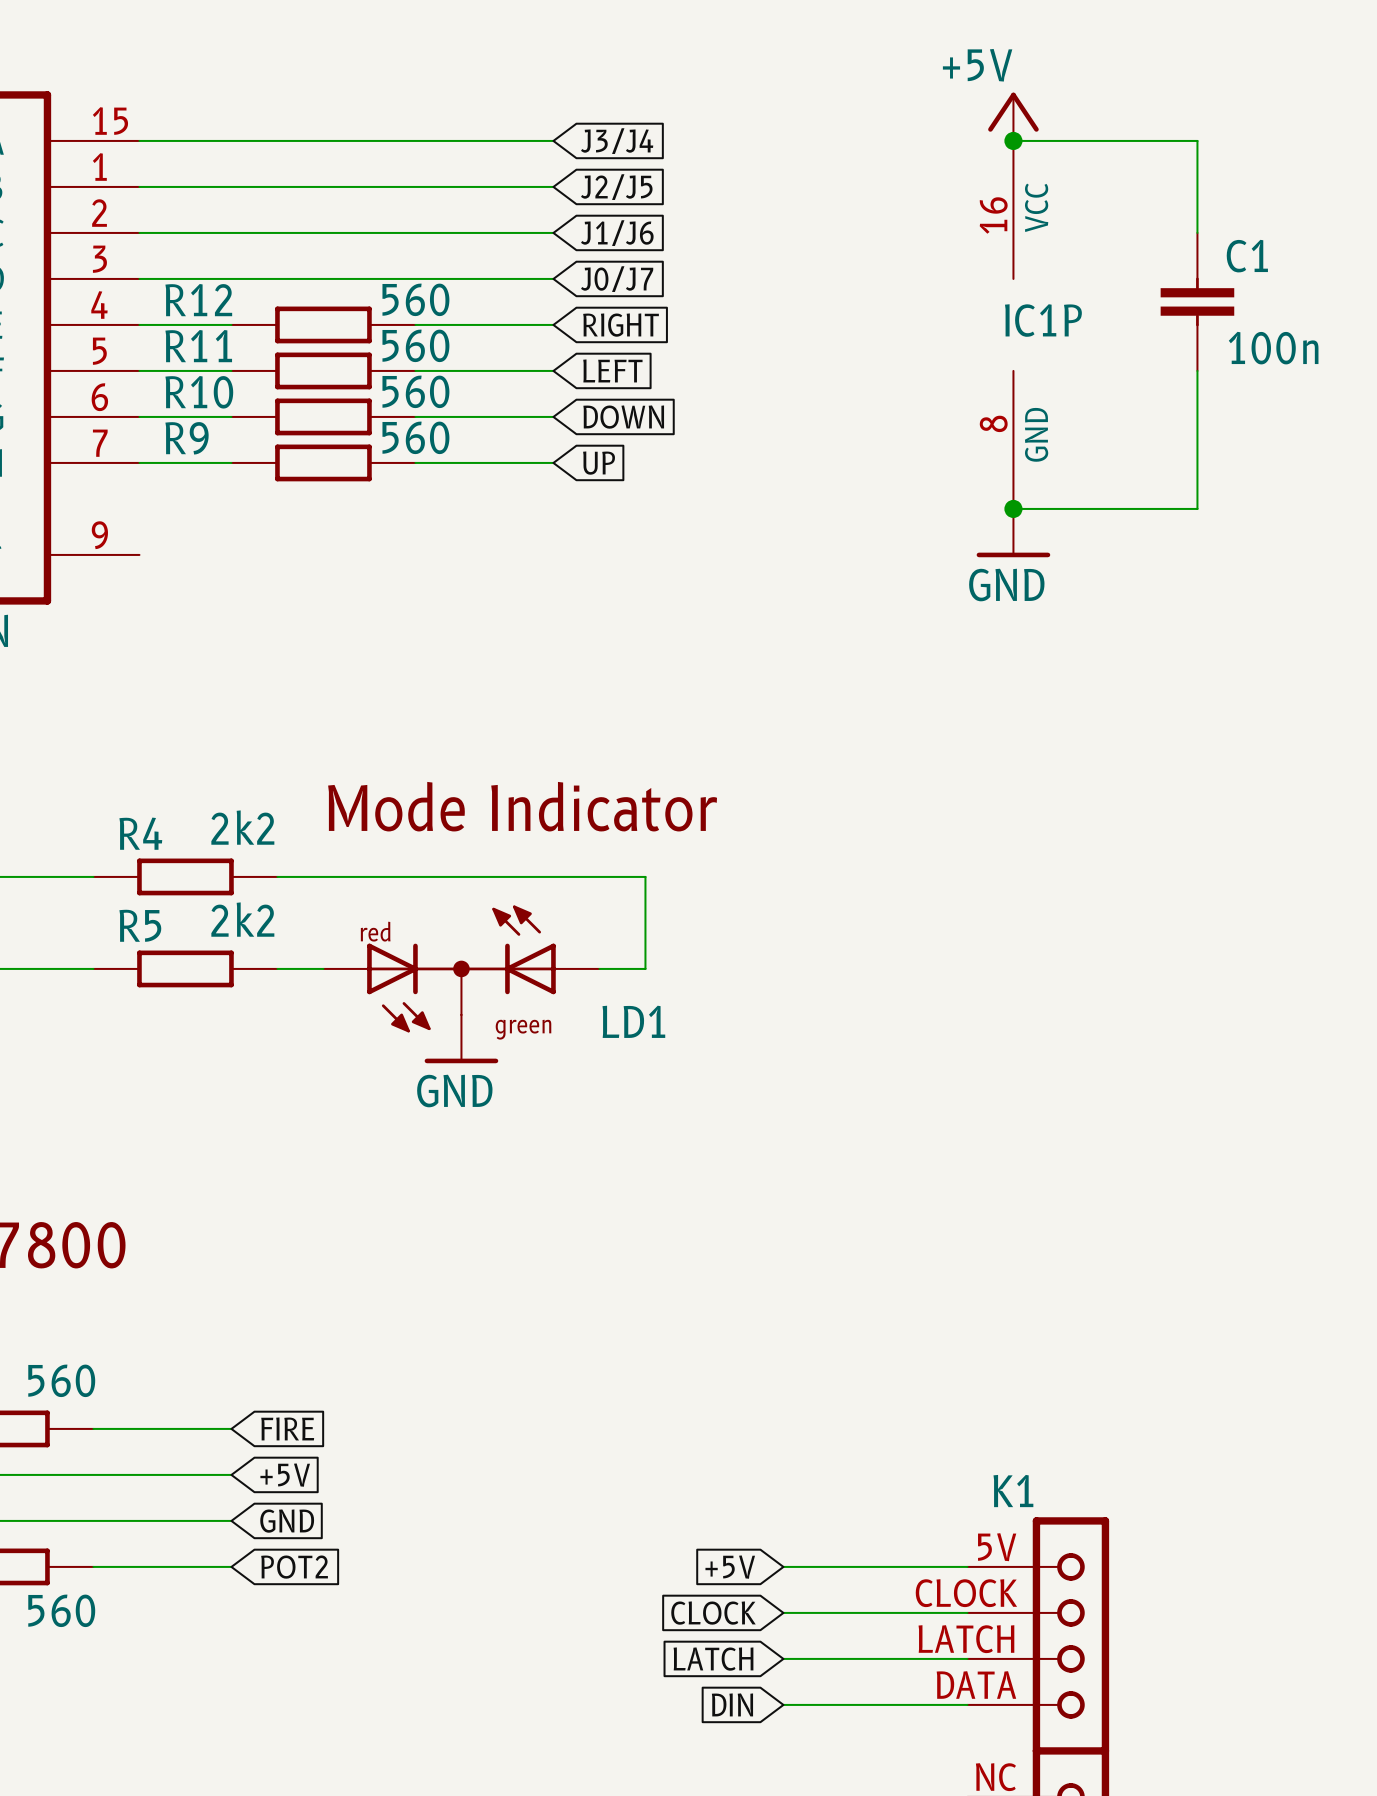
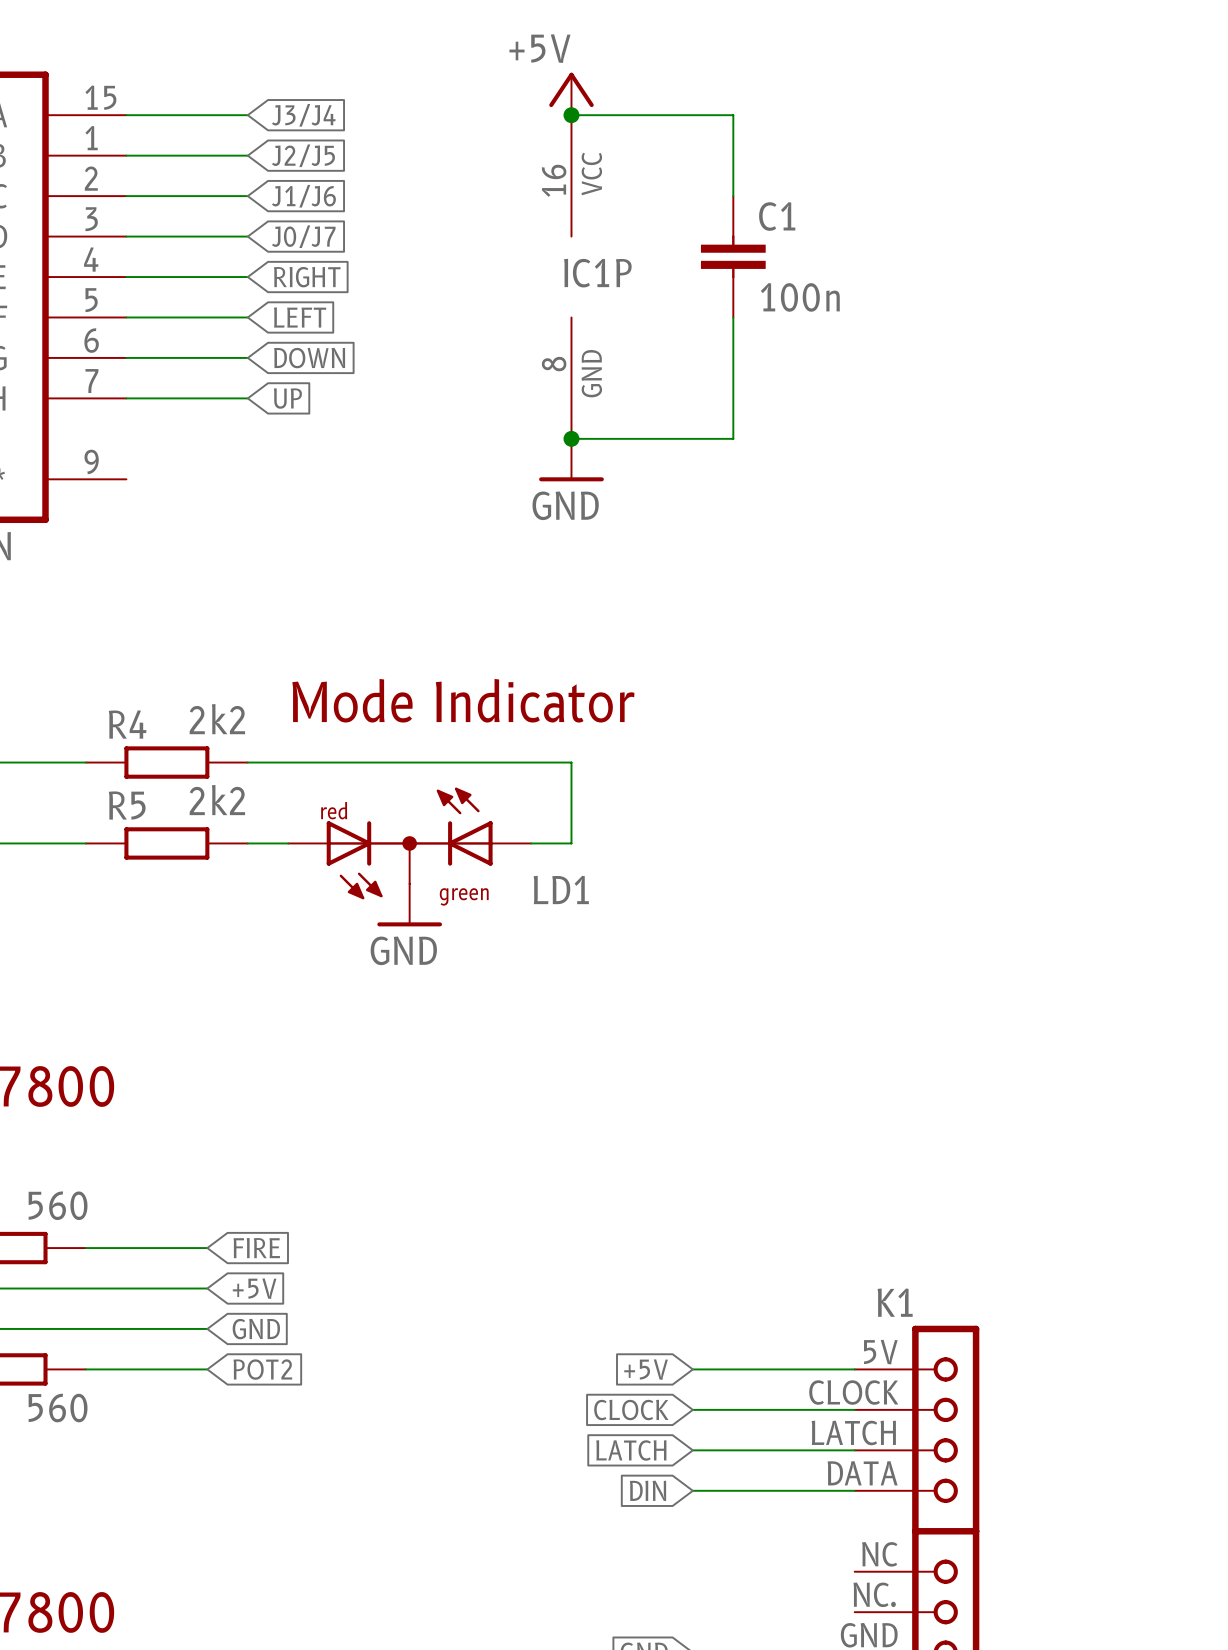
power symbol position: +5V (1013, 116) -> +5V (571, 93)
wire: (277, 140) (553, 140) -> none
junction: none -> (571, 115)
wire: (1013, 140) (1197, 140) (1197, 232) -> (571, 115) (733, 115) (733, 196)
junction: (1013, 140) -> none
global label position: J3/J4 (617, 141) -> J3/J4 (303, 115)
wire: (277, 186) (553, 186) -> none
global label position: J2/J5 (616, 187) -> J2/J5 (303, 155)
wire: (277, 232) (553, 232) -> none
global label position: J1/J6 (617, 233) -> J1/J6 (303, 196)
wire: (277, 278) (553, 278) -> none
global label position: J0/J7 (617, 279) -> J0/J7 (303, 236)
C1 position: (1197, 301) -> (733, 256)
R12: 560 (323, 324) -> none
wire: (415, 324) (553, 324) -> none
IC1P position: (1013, 324) -> (571, 277)
global label position: RIGHT (621, 325) -> RIGHT (307, 277)
R11: 560 (323, 370) -> none
wire: (415, 370) (553, 370) -> none
global label position: LEFT (612, 370) -> LEFT (300, 317)
wire: (1197, 370) (1197, 508) (1013, 508) -> (733, 317) (733, 438) (571, 438)
R10: 560 (323, 416) -> none
wire: (415, 416) (553, 416) -> none
global label position: DOWN (623, 417) -> DOWN (309, 358)
R9: 560 (323, 462) -> none
wire: (415, 462) (553, 462) -> none
global label position: UP (599, 463) -> UP (287, 398)
junction: none -> (571, 438)
junction: (1013, 508) -> none
power symbol position: GND (1013, 533) -> GND (571, 460)

